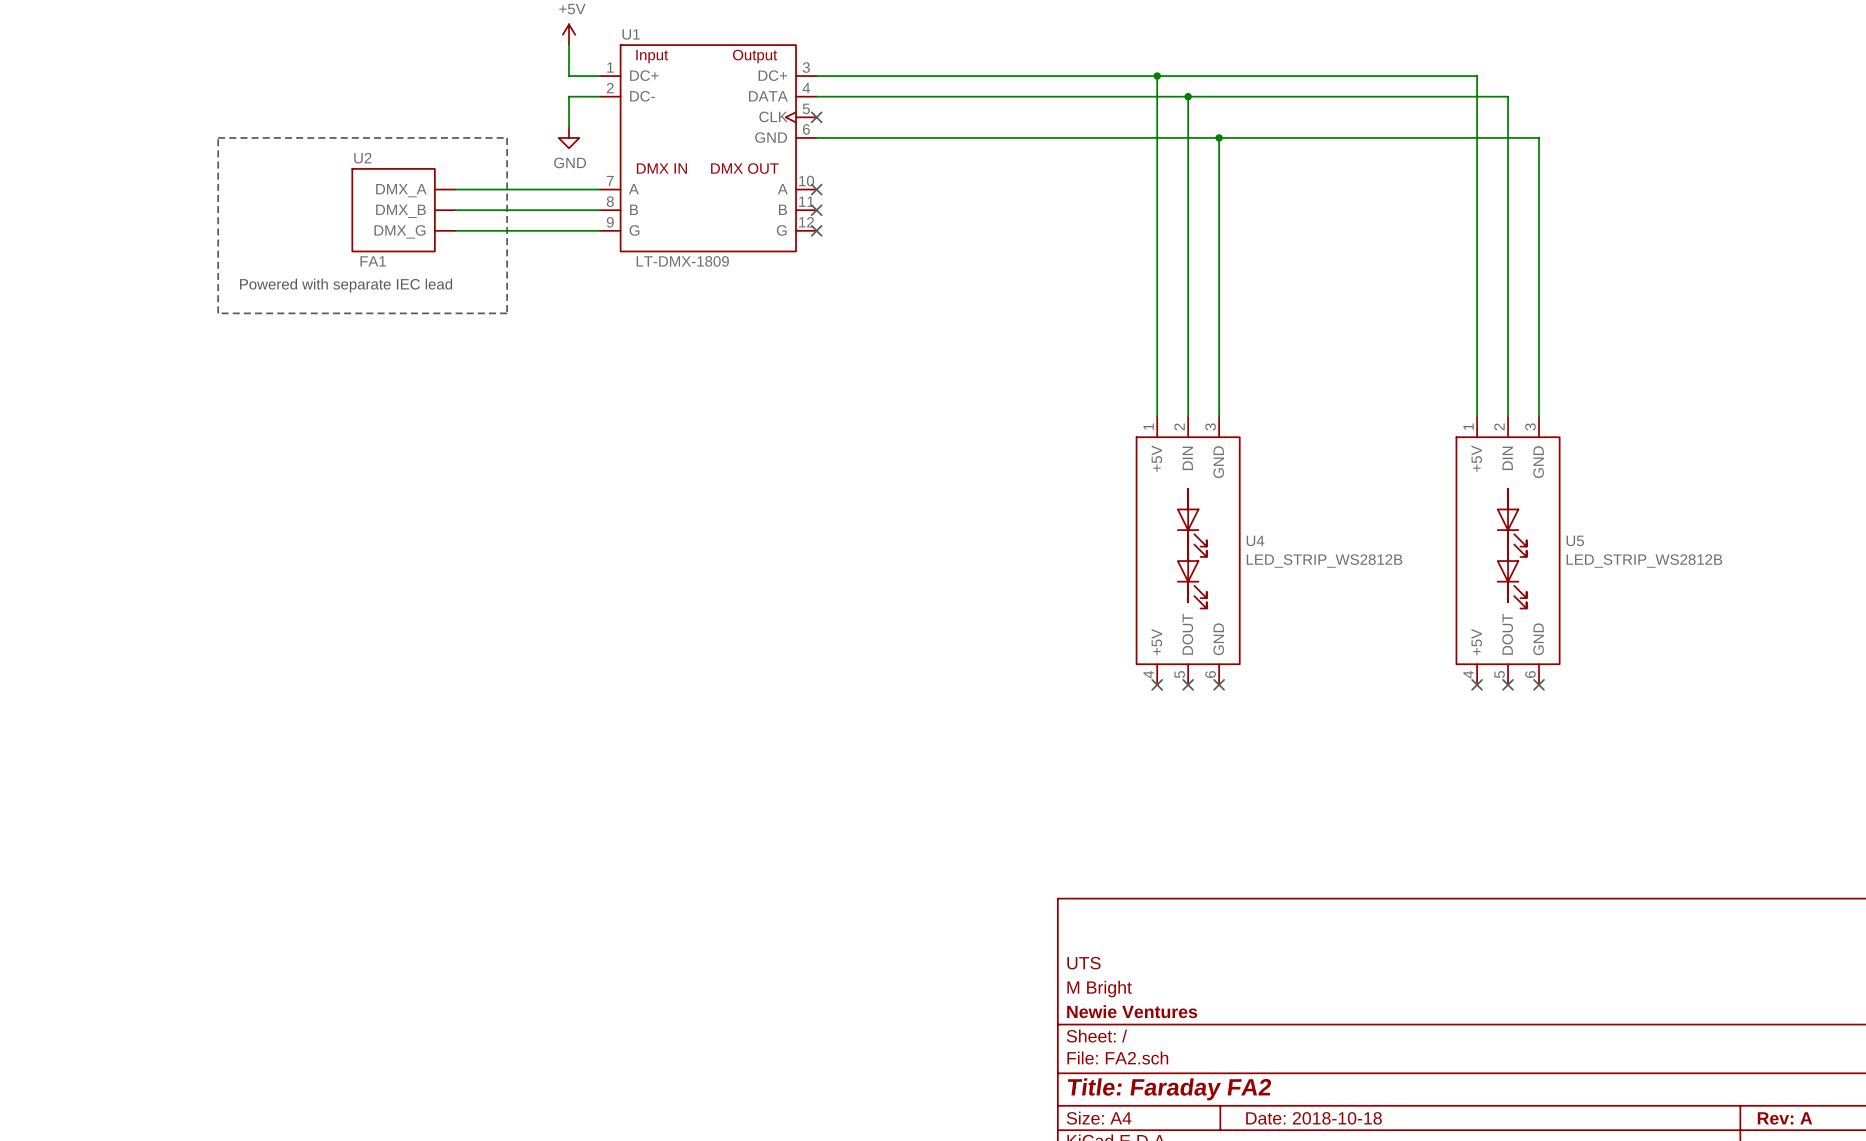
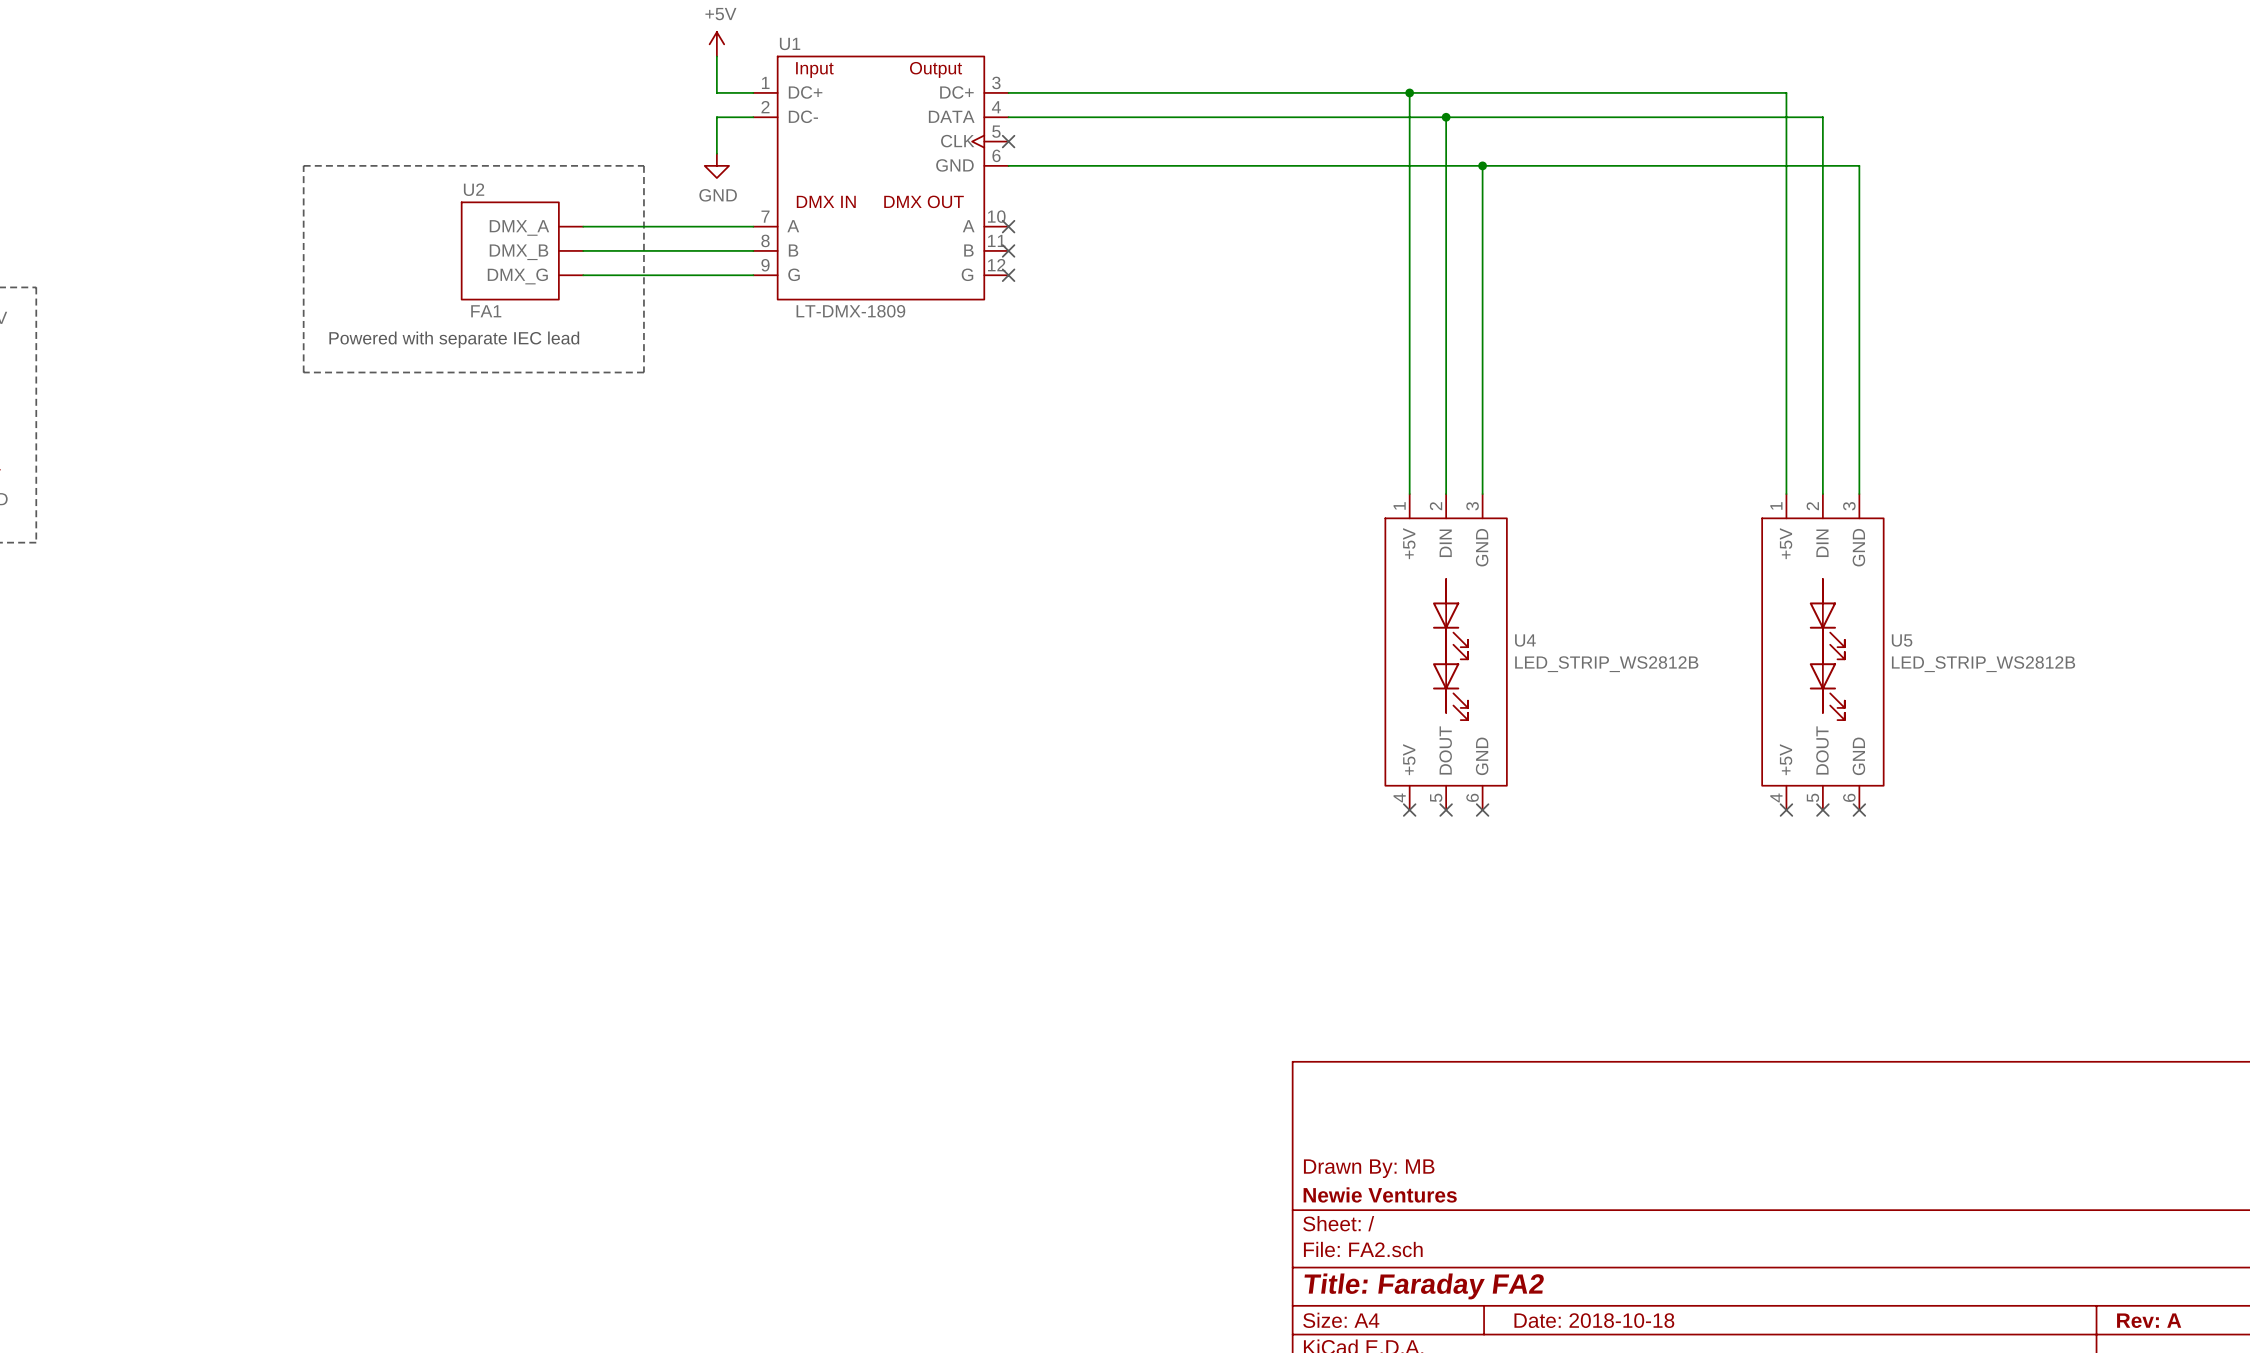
title block: UTS (1083, 963) -> none
title block: M Bright (1099, 989) -> Drawn By: MB (1369, 1168)

